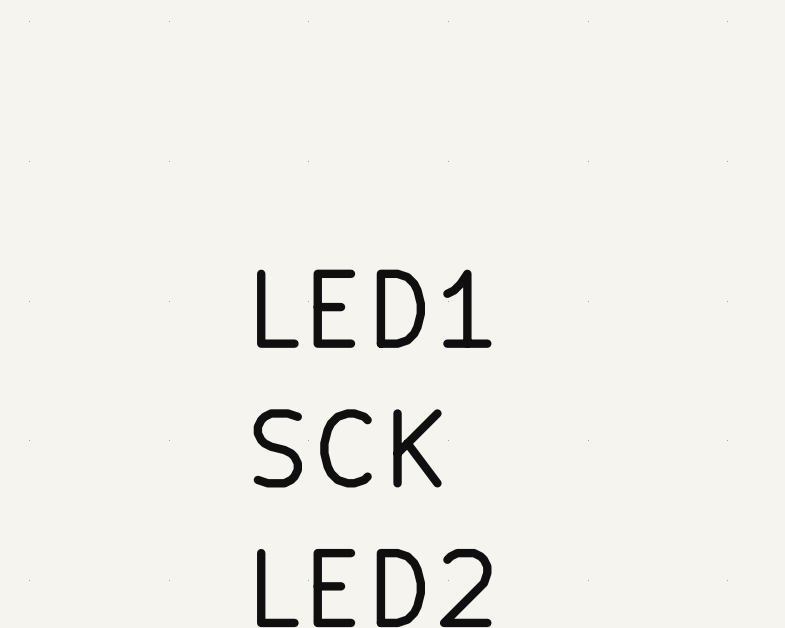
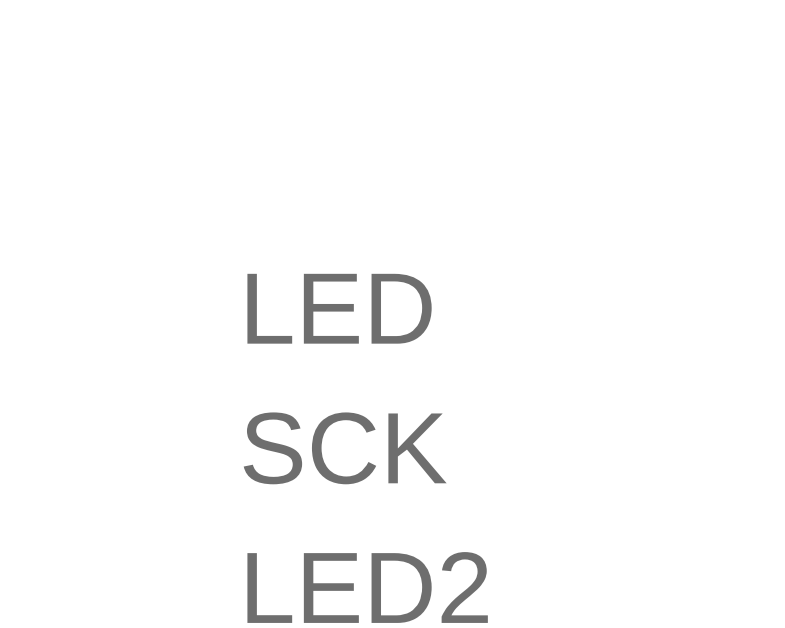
label: LED1 (374, 308) -> LED (339, 308)

